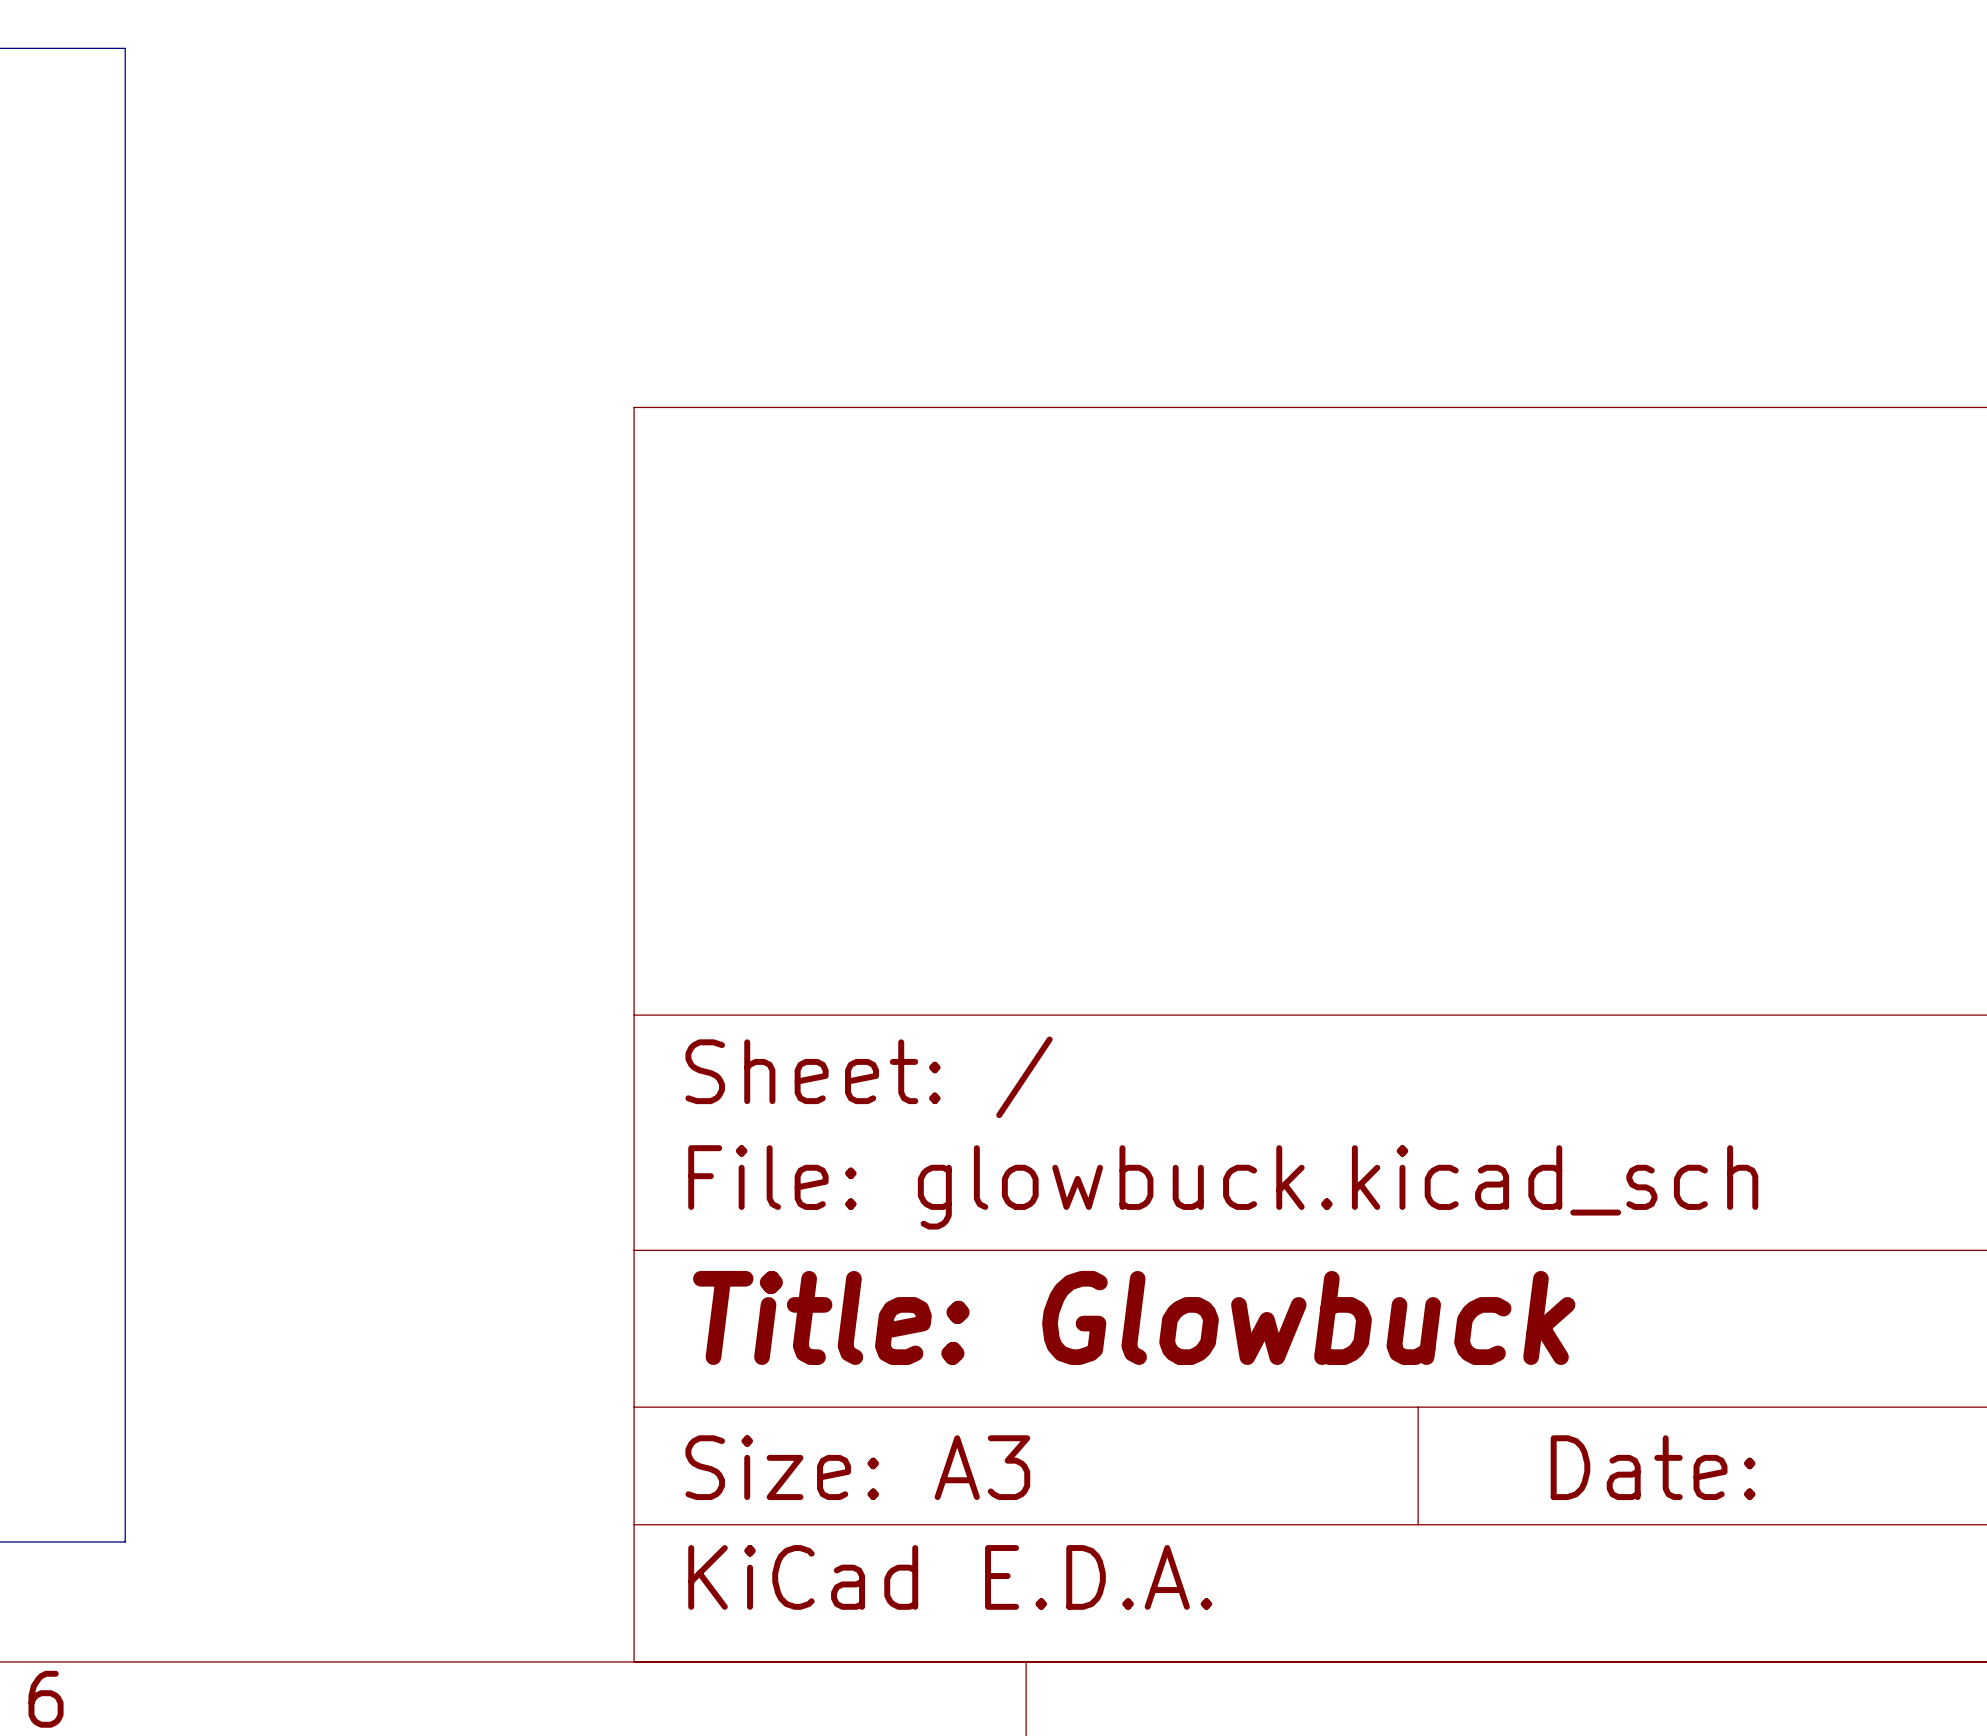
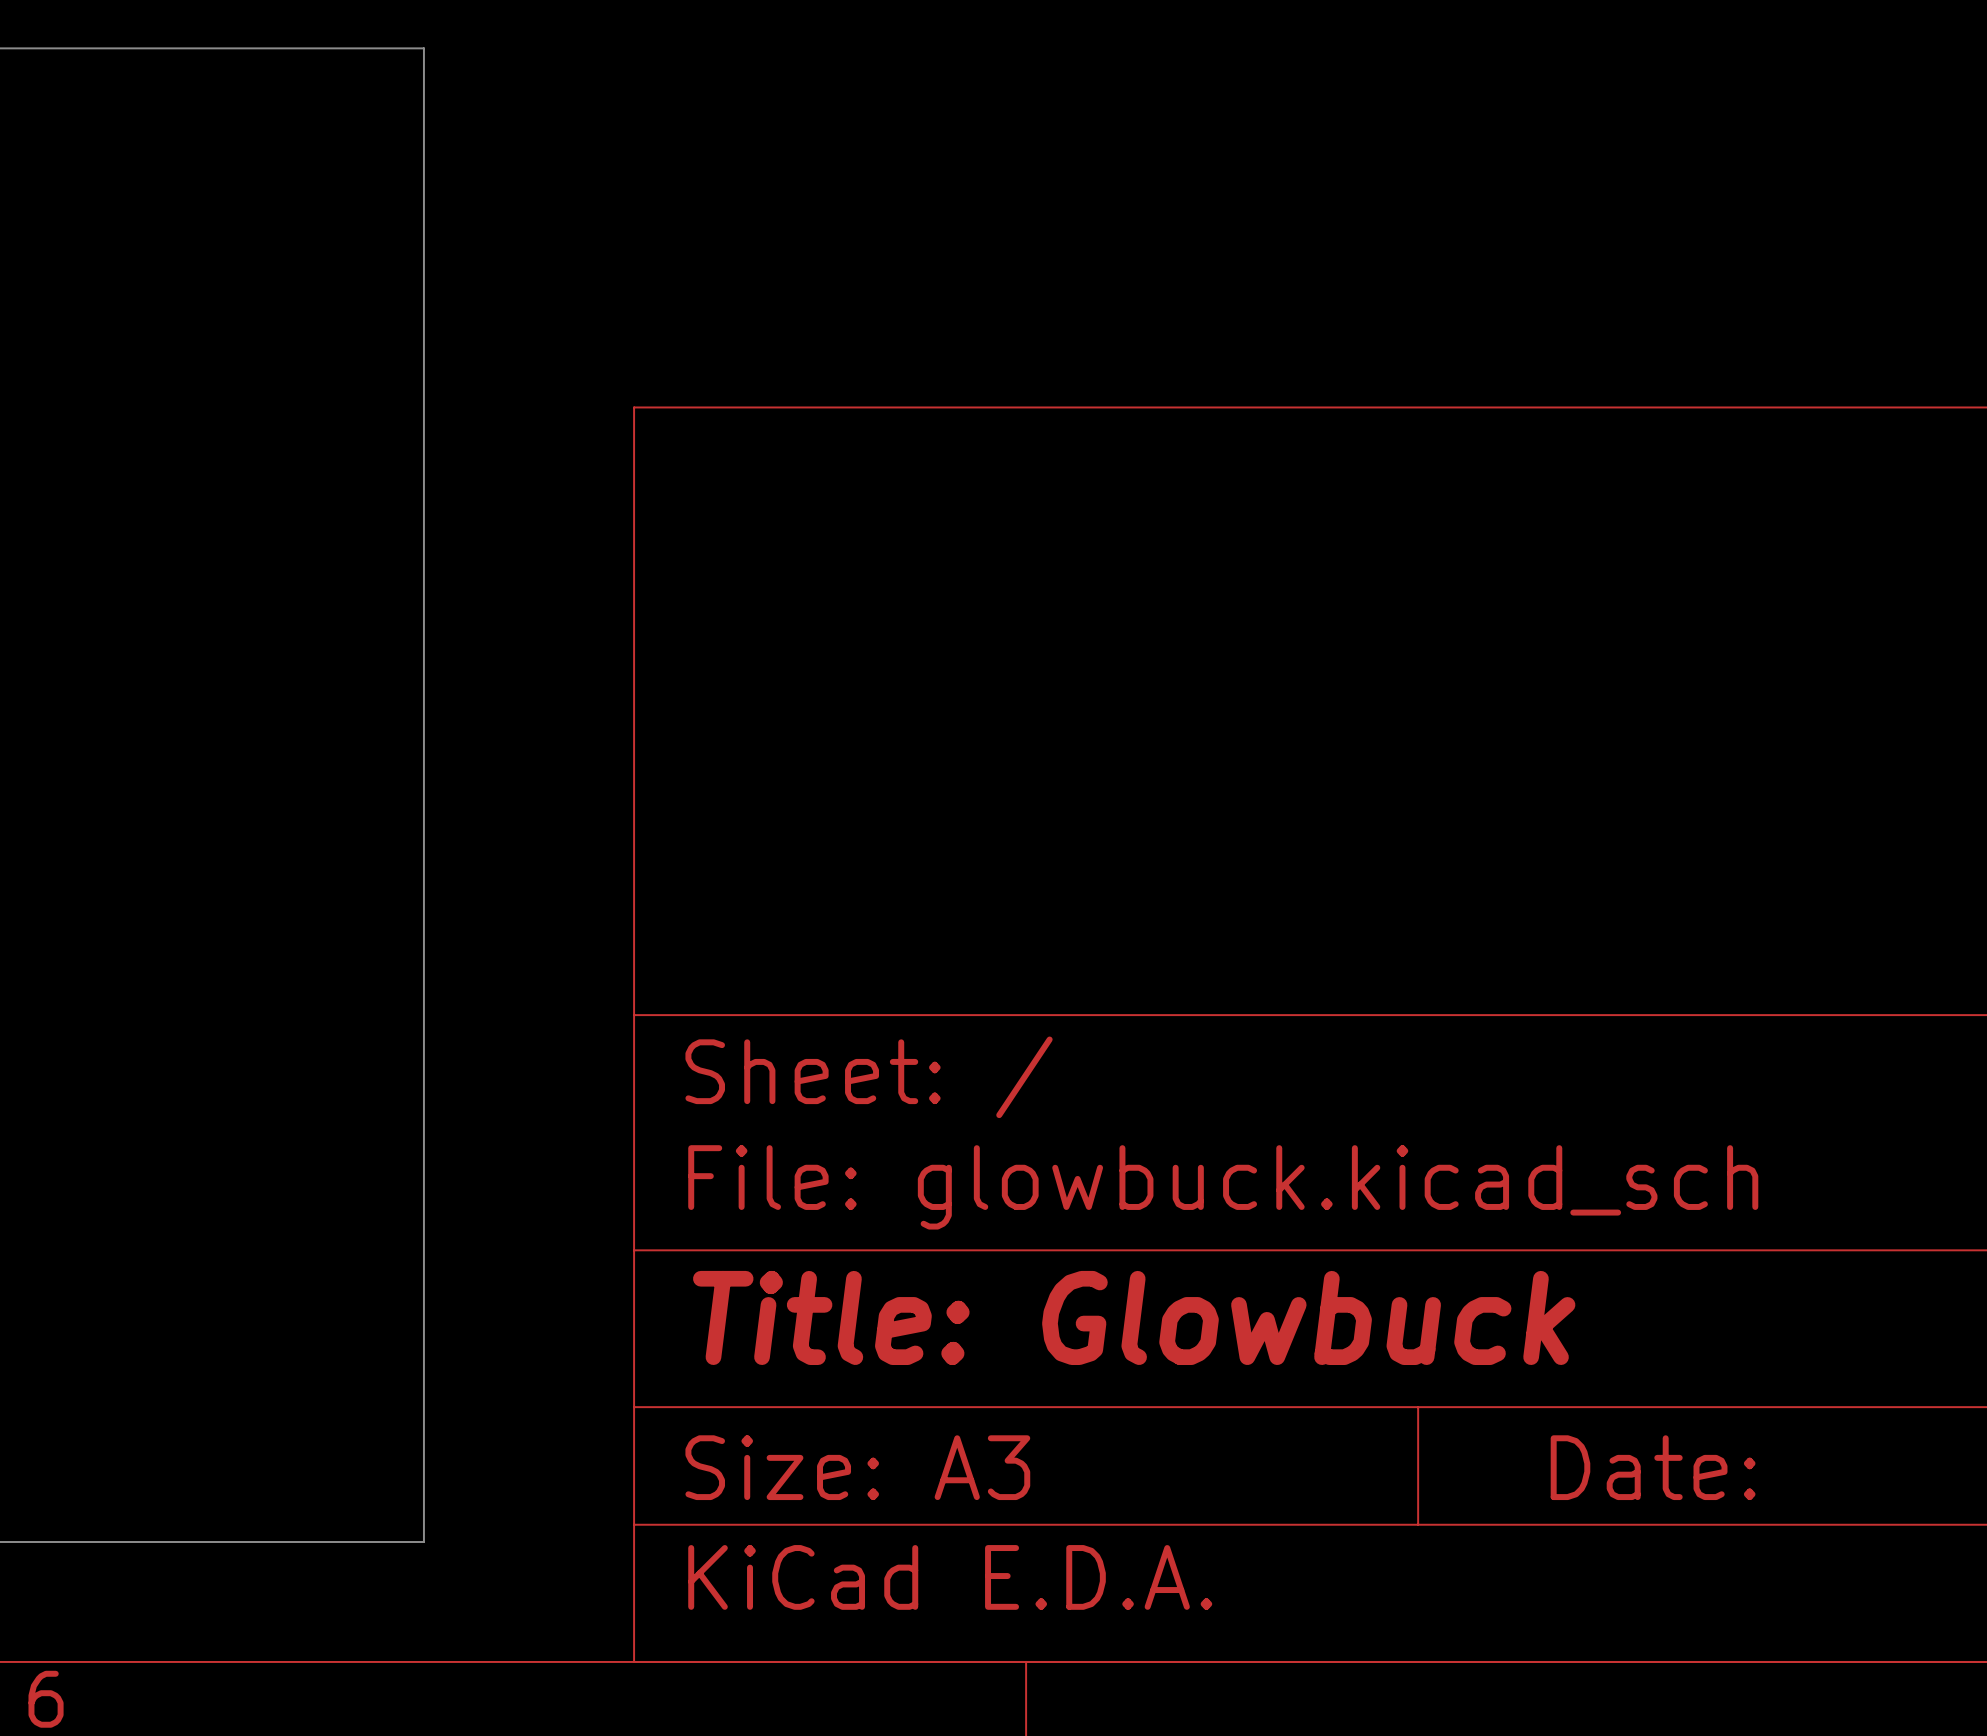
line: (125, 48) (125, 1542) -> (125, 48) (423, 48) (423, 1542) (125, 1542)

